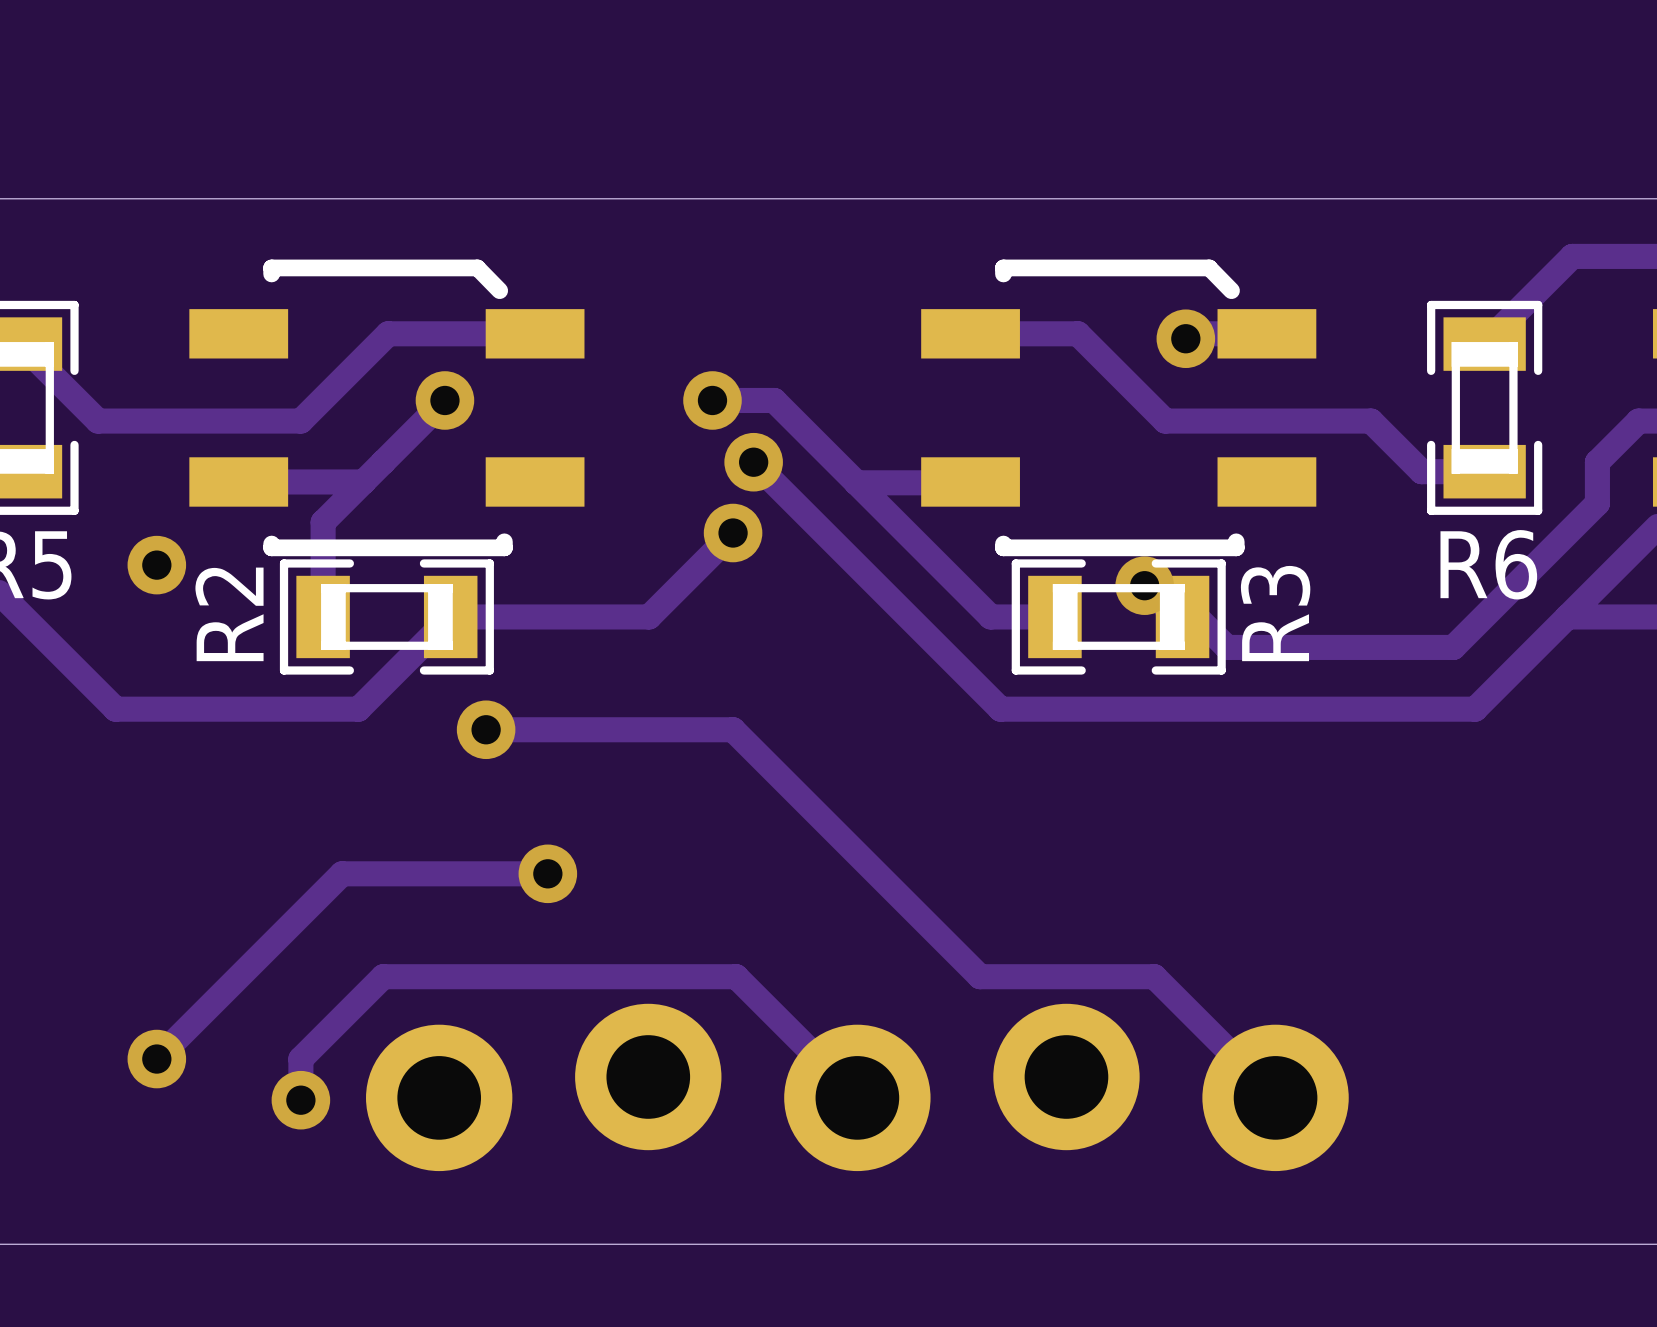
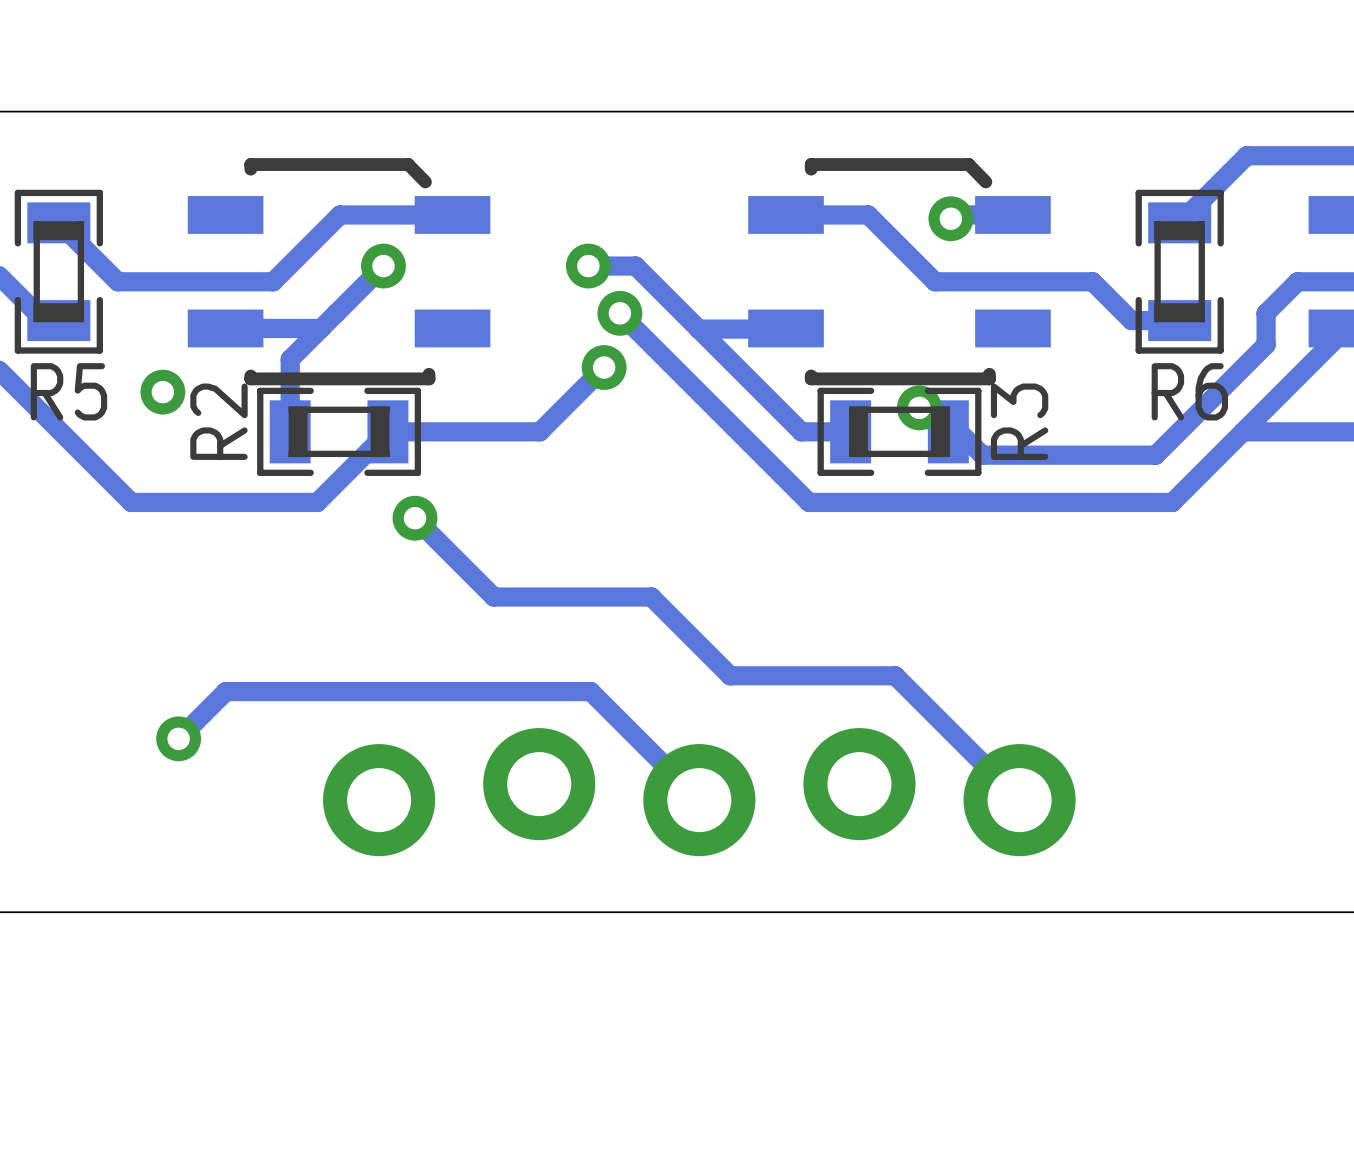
track: (486, 729) (733, 729) (980, 976) (1154, 976) -> (415, 518) (493, 597) (651, 597) (730, 675) (895, 675) (926, 707)
track: (547, 873) (342, 873) (156, 1059) -> none
via: (547, 873) -> none
track: (736, 976) (383, 976) (300, 1059) (300, 1100) -> (606, 707) (590, 691) (225, 691) (178, 738)
via position: (156, 1059) -> (178, 738)
via: (300, 1100) -> none

